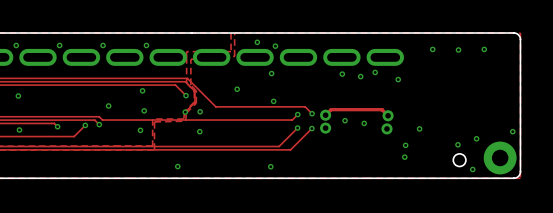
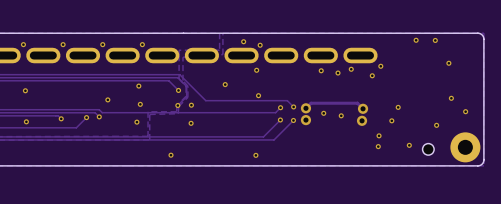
via: none -> (416, 40)
via: none -> (435, 40)
via: (432, 49) -> none
via: (458, 49) -> none
via: (484, 49) -> none
via: none -> (448, 63)
via: none -> (380, 66)
via: none -> (451, 98)
via: none -> (398, 107)
via: none -> (465, 111)
via: (512, 131) -> none
via: none -> (436, 125)
via: (476, 138) -> none
via: (457, 144) -> none
via: none -> (409, 145)
via: (472, 169) -> none

